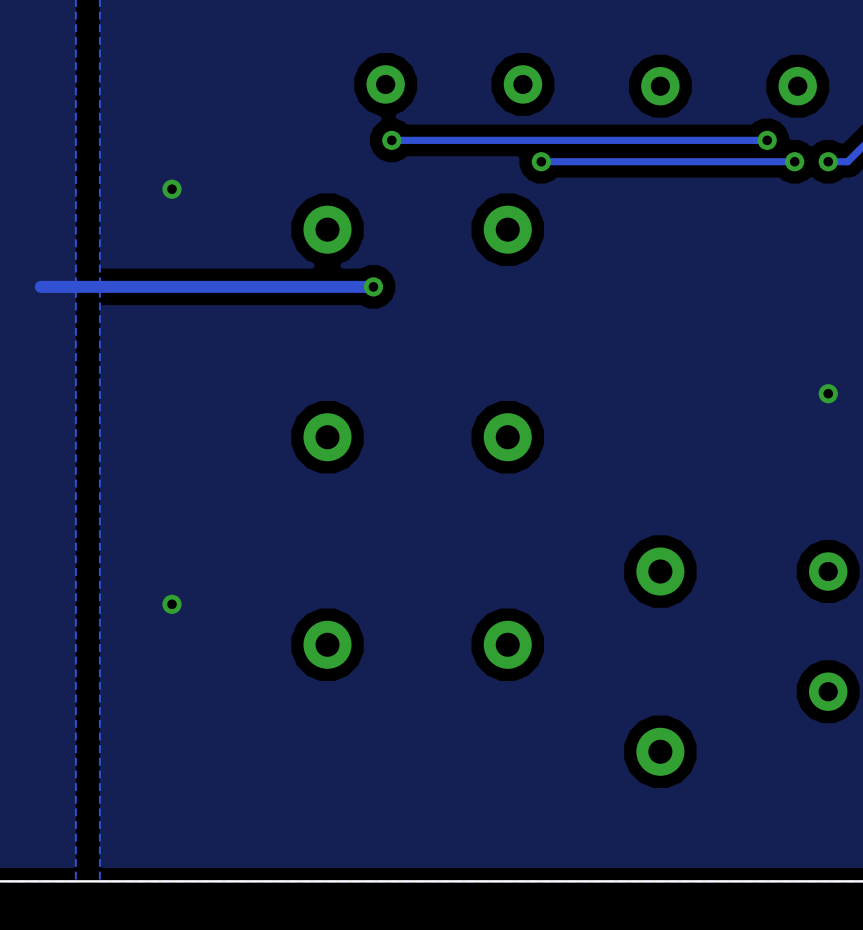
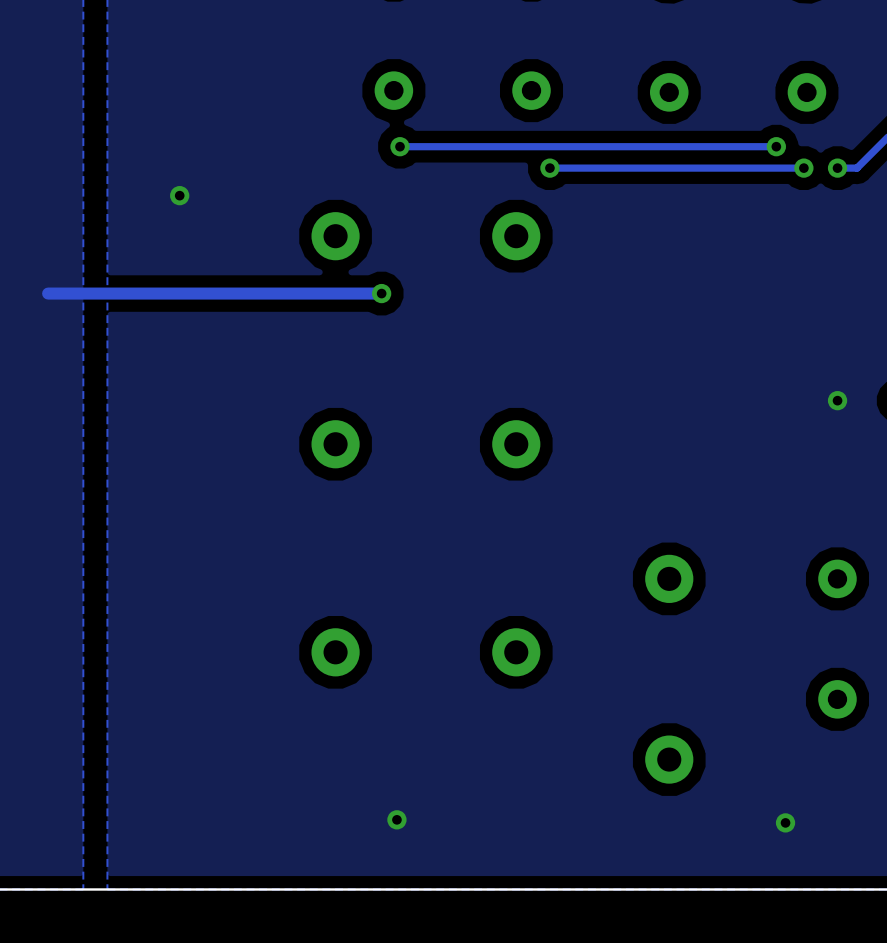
via: (172, 604) -> none
via: none -> (396, 819)
via: none -> (785, 822)

